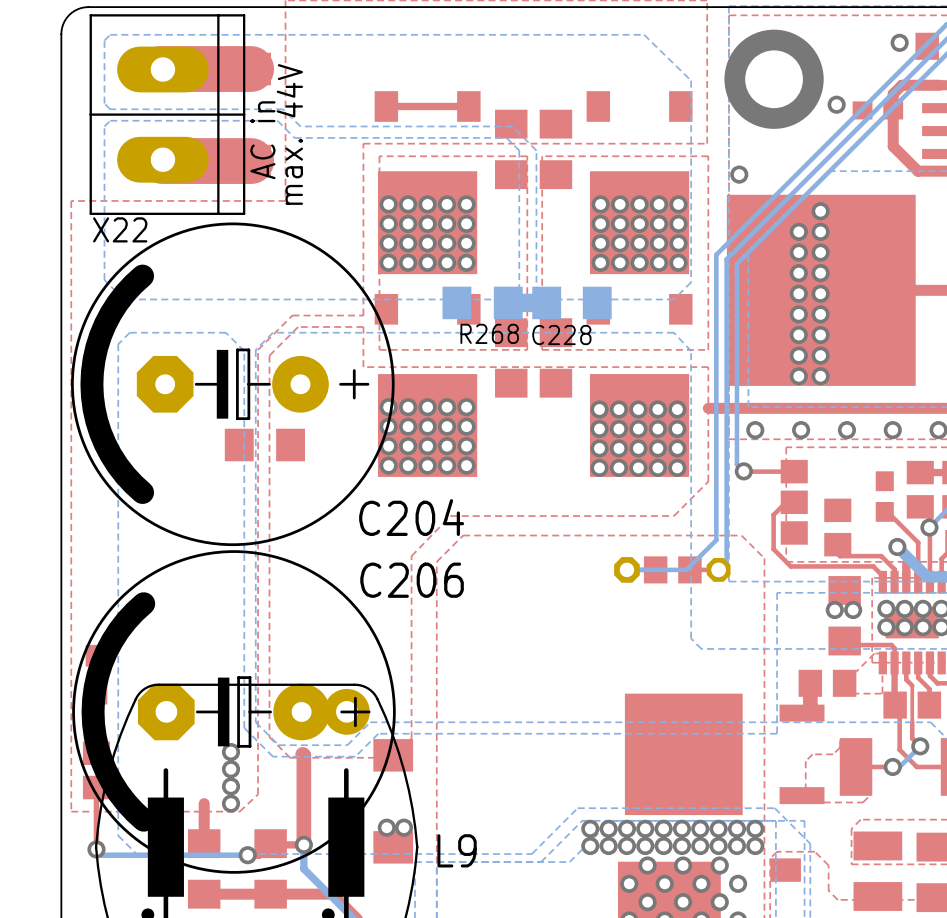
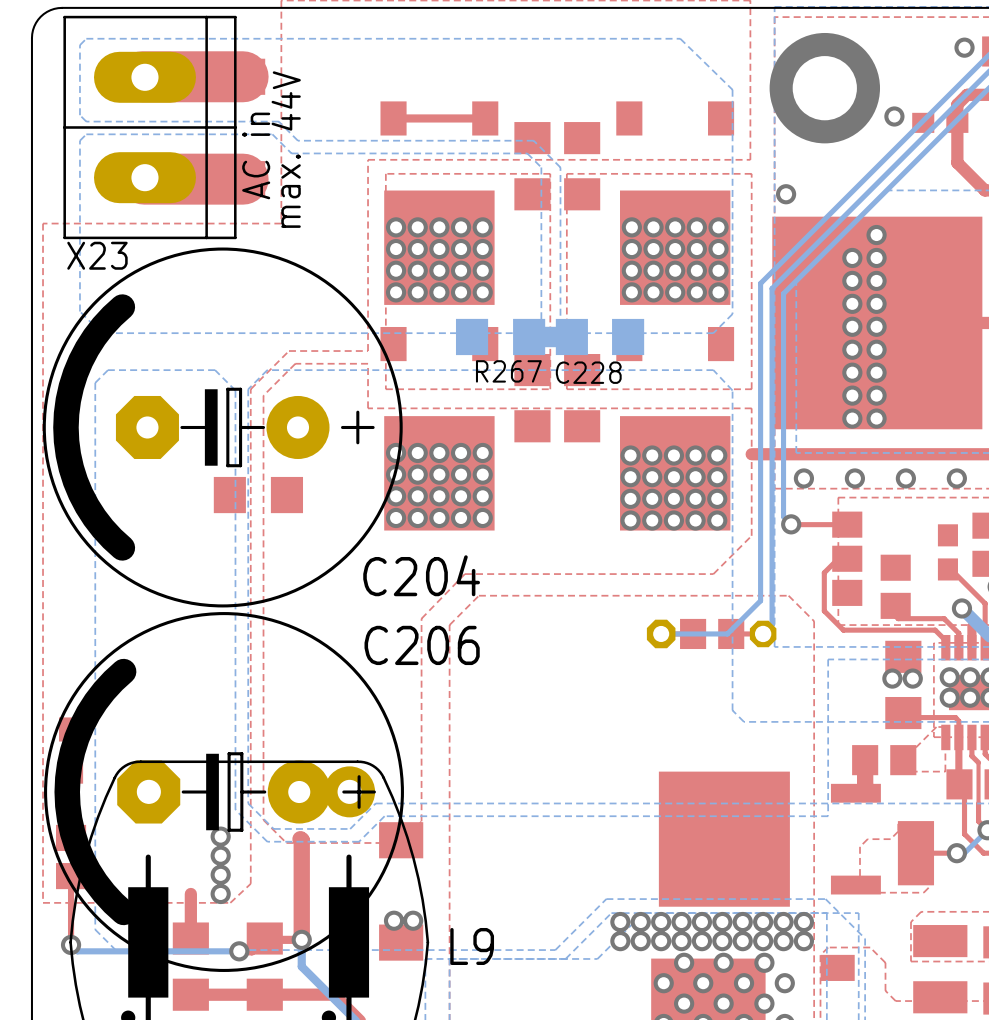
X22 name: X22 (120, 229) -> X23 (97, 255)
R268 name: R268 (489, 333) -> R267 (508, 371)

